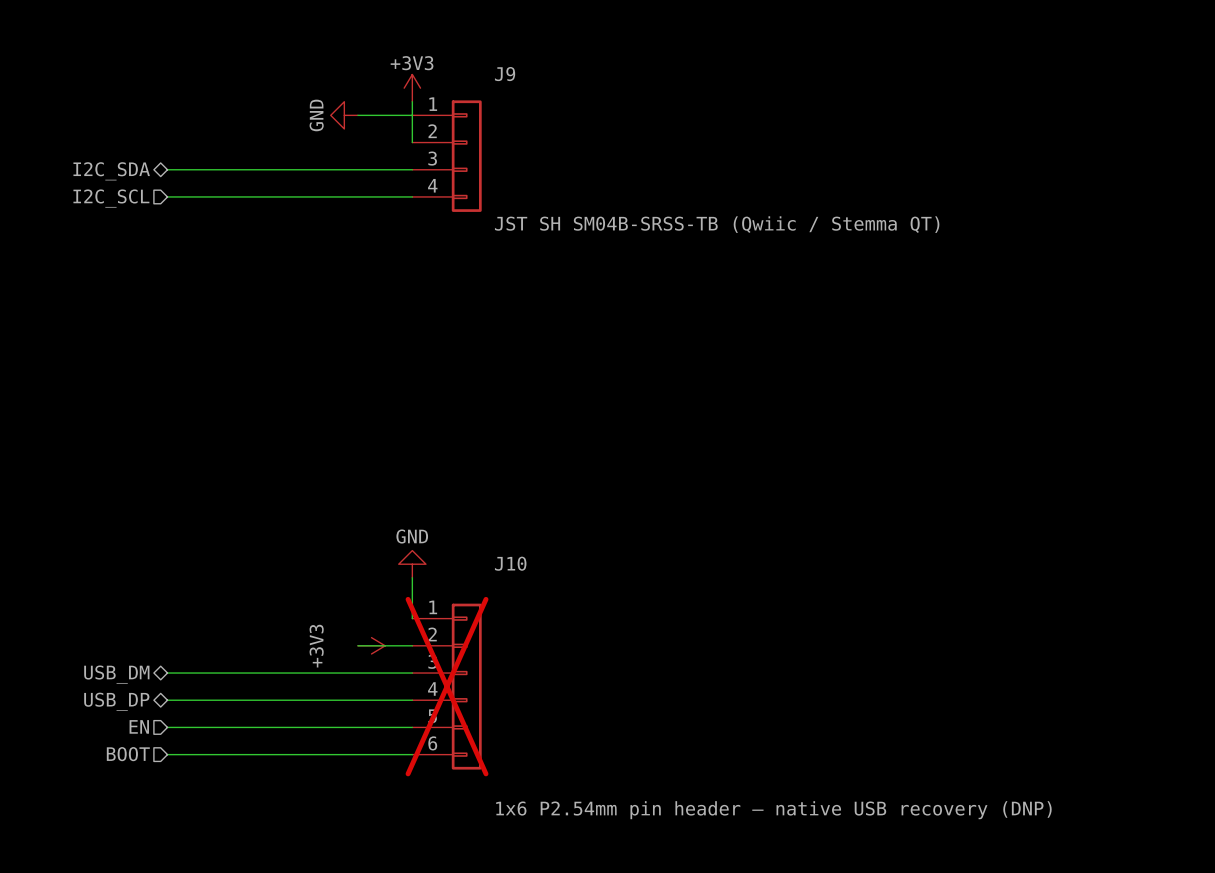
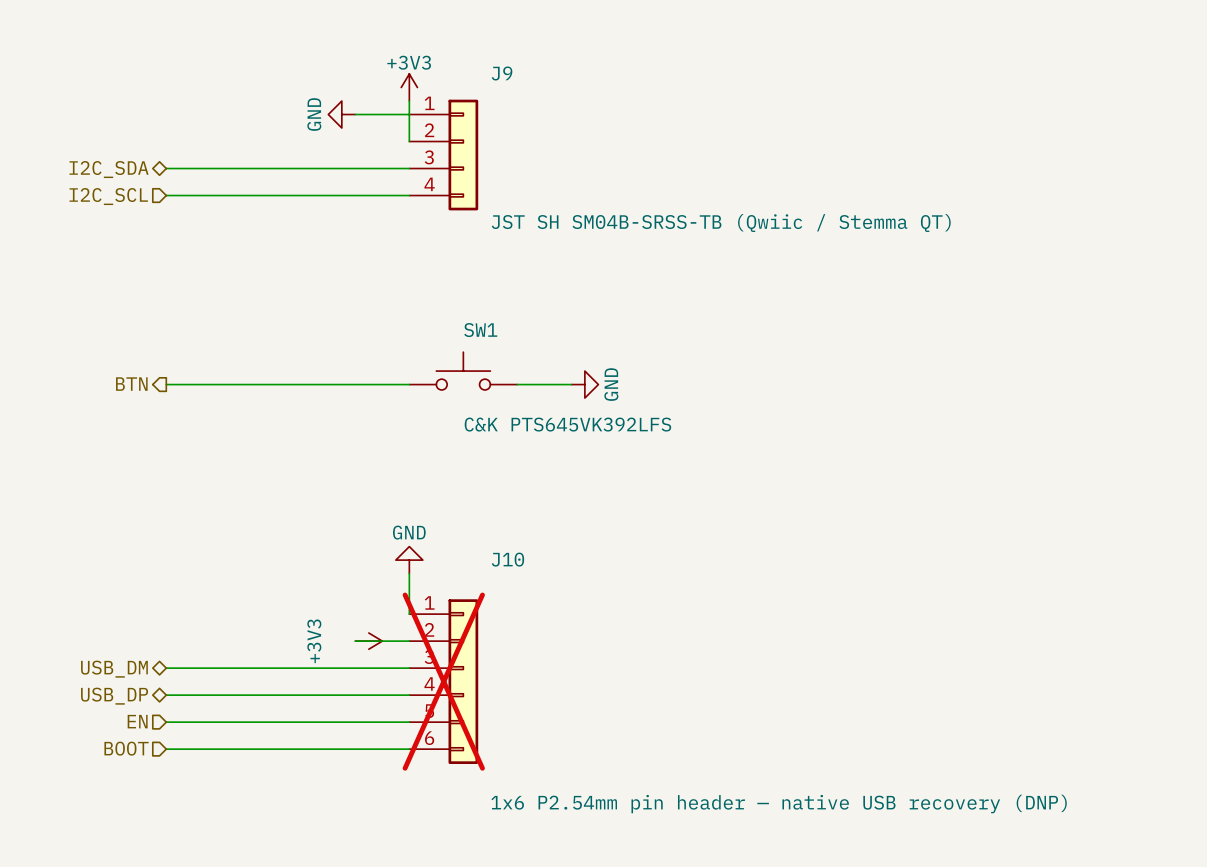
SW1: none -> C&K PTS645VK392LFS (463, 371)
hierarchical label: none -> BTN (131, 384)
wire: none -> (166, 384) (409, 384)
wire: none -> (517, 384) (571, 384)
power symbol: none -> GND (584, 384)

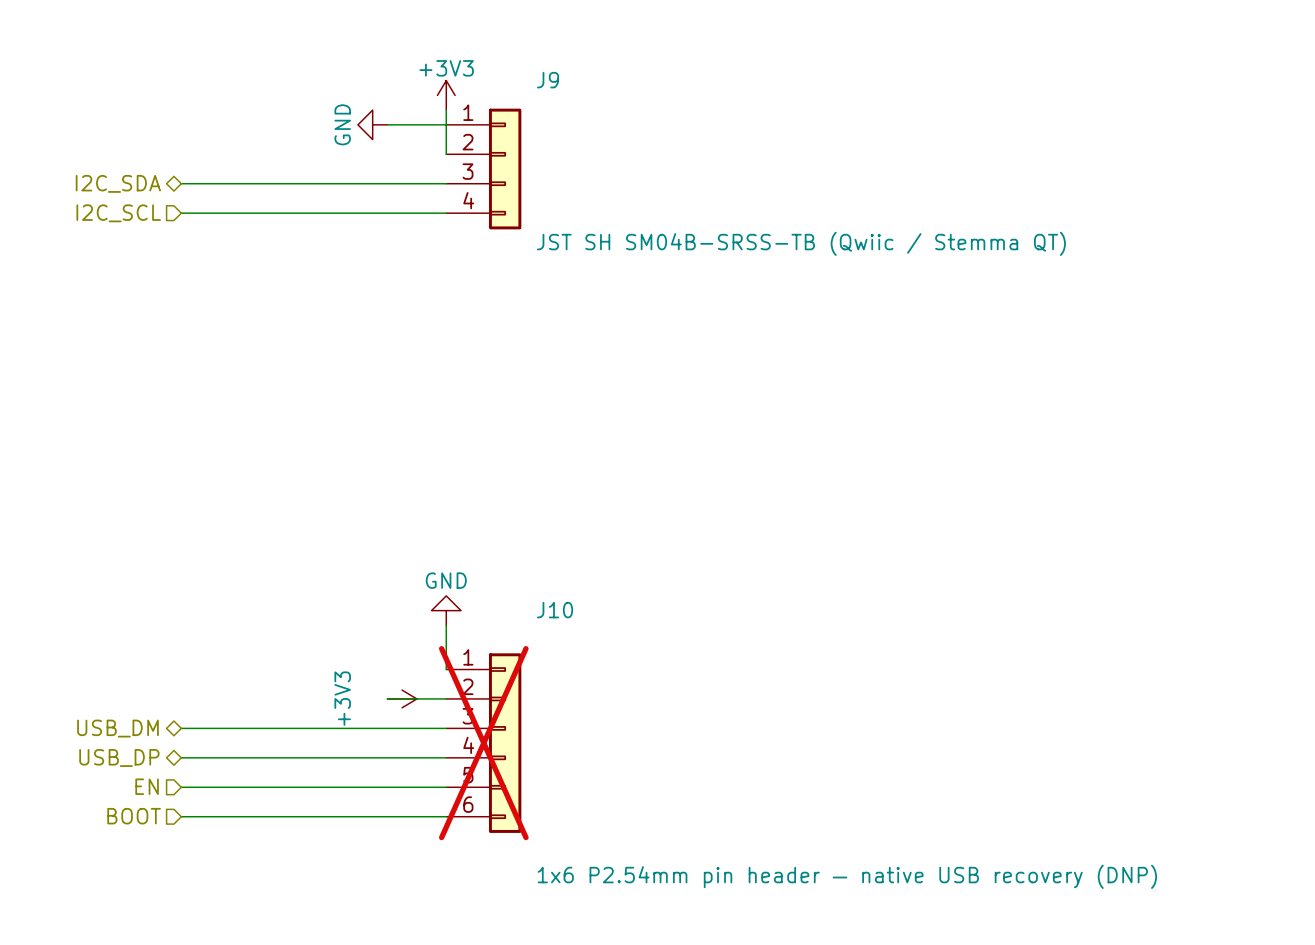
SW1: C&K PTS645VK392LFS (463, 371) -> none
hierarchical label: BTN (131, 384) -> none
wire: (166, 384) (409, 384) -> none
wire: (517, 384) (571, 384) -> none
power symbol: GND (584, 384) -> none

